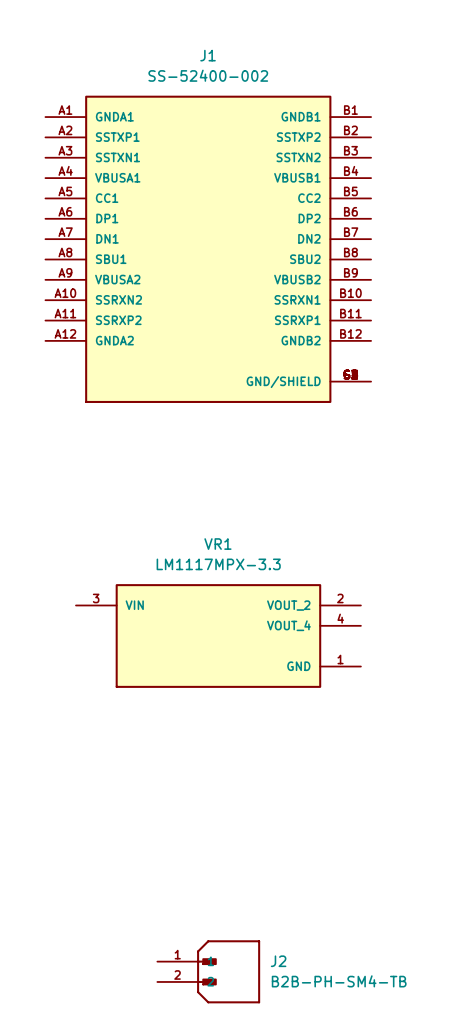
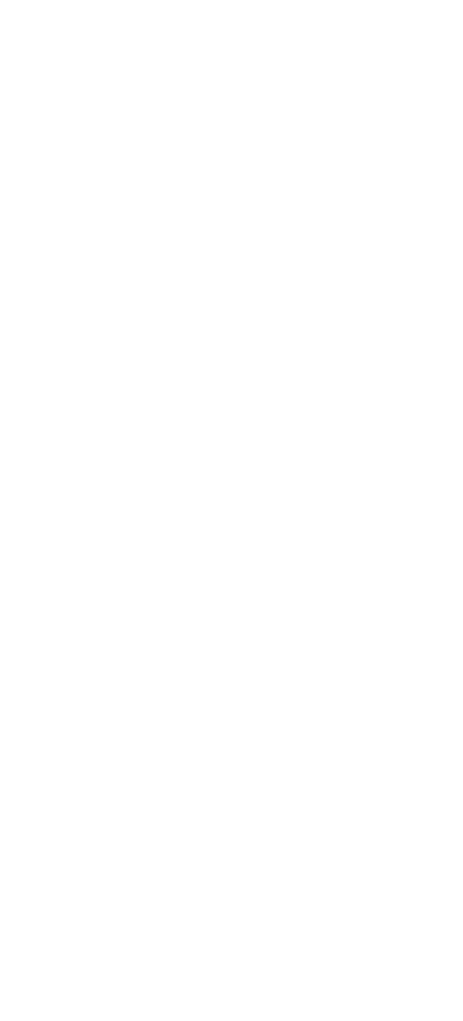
J1: SS-52400-002 (208, 249) -> none
VR1: LM1117MPX-3.3 (218, 636) -> none
J2: B2B-PH-SM4-TB (208, 971) -> none

